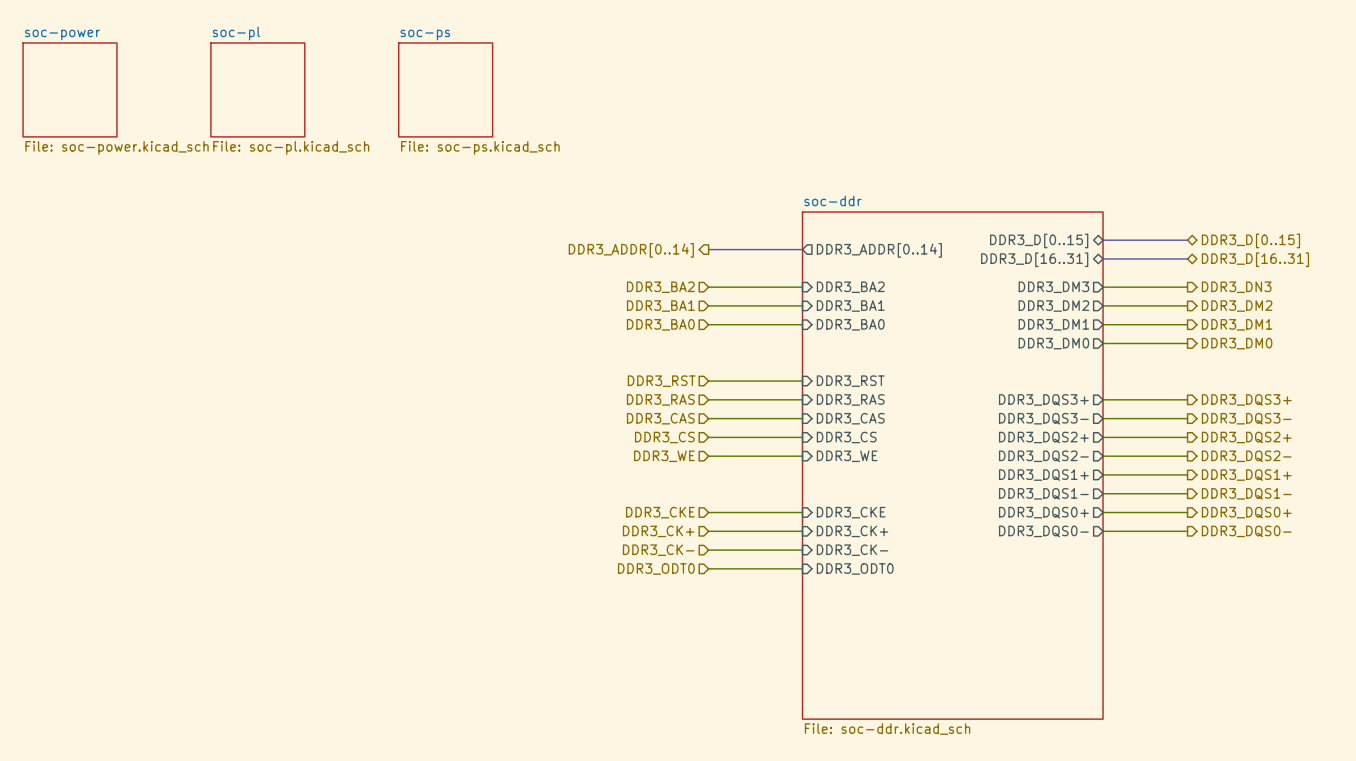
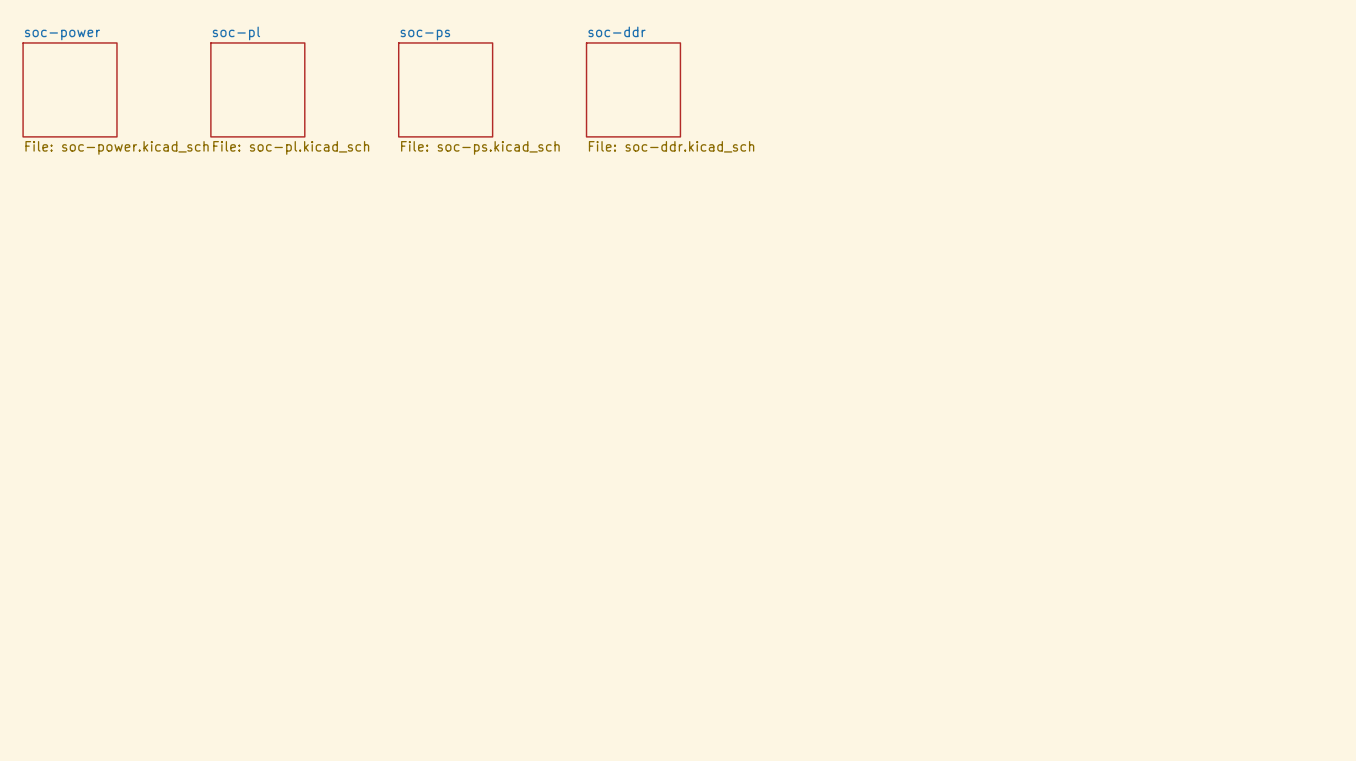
sheet soc-ddr: none -> File: soc-ddr.kicad_sch (633, 89)
sheet pin: DDR3_D[0..15] (1039, 240) -> none
bus: (1103, 240) (1187, 240) -> none
hierarchical label: DDR3_D[0..15] (1250, 240) -> none
bus: (708, 249) (802, 249) -> none
hierarchical label: DDR3_ADDR[0..14] (631, 250) -> none
sheet pin: DDR3_ADDR[0..14] (879, 250) -> none
bus: (1103, 258) (1187, 258) -> none
sheet pin: DDR3_D[16..31] (1034, 259) -> none
hierarchical label: DDR3_D[16..31] (1255, 259) -> none
hierarchical label: DDR3_BA2 (660, 287) -> none
wire: (708, 287) (802, 287) -> none
sheet pin: DDR3_BA2 (850, 287) -> none
sheet pin: DDR3_DM3 (1053, 287) -> none
wire: (1103, 287) (1187, 287) -> none
hierarchical label: DDR3_DN3 (1236, 287) -> none
wire: (708, 305) (802, 305) -> none
wire: (1103, 305) (1187, 305) -> none
hierarchical label: DDR3_BA1 (660, 306) -> none
sheet pin: DDR3_BA1 (850, 306) -> none
sheet pin: DDR3_DM2 (1053, 306) -> none
hierarchical label: DDR3_DM2 (1237, 306) -> none
hierarchical label: DDR3_BA0 (660, 324) -> none
wire: (708, 324) (802, 324) -> none
sheet pin: DDR3_BA0 (850, 324) -> none
sheet pin: DDR3_DM1 (1053, 324) -> none
wire: (1103, 324) (1187, 324) -> none
hierarchical label: DDR3_DM1 (1237, 324) -> none
sheet pin: DDR3_DM0 (1053, 343) -> none
wire: (1103, 343) (1187, 343) -> none
hierarchical label: DDR3_DM0 (1237, 343) -> none
hierarchical label: DDR3_RST (661, 381) -> none
wire: (708, 381) (802, 381) -> none
sheet pin: DDR3_RST (850, 381) -> none
hierarchical label: DDR3_RAS (660, 399) -> none
wire: (708, 399) (802, 399) -> none
sheet pin: DDR3_RAS (850, 399) -> none
sheet pin: DDR3_DQS3+ (1043, 399) -> none
wire: (1103, 399) (1187, 399) -> none
hierarchical label: DDR3_DQS3+ (1246, 399) -> none
hierarchical label: DDR3_CAS (660, 418) -> none
wire: (708, 418) (802, 418) -> none
sheet pin: DDR3_CAS (850, 418) -> none
sheet pin: DDR3_DQS3- (1043, 418) -> none
wire: (1103, 418) (1187, 418) -> none
hierarchical label: DDR3_DQS3- (1246, 418) -> none
hierarchical label: DDR3_CS (664, 437) -> none
wire: (708, 437) (802, 437) -> none
sheet pin: DDR3_CS (846, 437) -> none
sheet pin: DDR3_DQS2+ (1043, 437) -> none
wire: (1103, 437) (1187, 437) -> none
hierarchical label: DDR3_DQS2+ (1246, 437) -> none
hierarchical label: DDR3_WE (664, 456) -> none
wire: (708, 456) (802, 456) -> none
sheet pin: DDR3_WE (847, 456) -> none
sheet pin: DDR3_DQS2- (1043, 456) -> none
wire: (1103, 456) (1187, 456) -> none
hierarchical label: DDR3_DQS2- (1246, 456) -> none
sheet soc-ddr: File: soc-ddr.kicad_sch (952, 465) -> none
wire: (1103, 474) (1187, 474) -> none
sheet pin: DDR3_DQS1+ (1043, 475) -> none
hierarchical label: DDR3_DQS1+ (1246, 475) -> none
sheet pin: DDR3_DQS1- (1043, 493) -> none
wire: (1103, 493) (1187, 493) -> none
hierarchical label: DDR3_DQS1- (1246, 493) -> none
hierarchical label: DDR3_CKE (660, 512) -> none
wire: (708, 512) (802, 512) -> none
sheet pin: DDR3_CKE (851, 512) -> none
sheet pin: DDR3_DQS0+ (1043, 512) -> none
wire: (1103, 512) (1187, 512) -> none
hierarchical label: DDR3_DQS0+ (1246, 512) -> none
hierarchical label: DDR3_CK+ (658, 531) -> none
wire: (708, 531) (802, 531) -> none
sheet pin: DDR3_CK+ (852, 531) -> none
sheet pin: DDR3_DQS0- (1043, 531) -> none
wire: (1103, 531) (1187, 531) -> none
hierarchical label: DDR3_DQS0- (1246, 531) -> none
hierarchical label: DDR3_CK- (658, 550) -> none
wire: (708, 550) (802, 550) -> none
sheet pin: DDR3_CK- (852, 550) -> none
hierarchical label: DDR3_ODT0 (656, 568) -> none
wire: (708, 568) (802, 568) -> none
sheet pin: DDR3_ODT0 (855, 568) -> none

